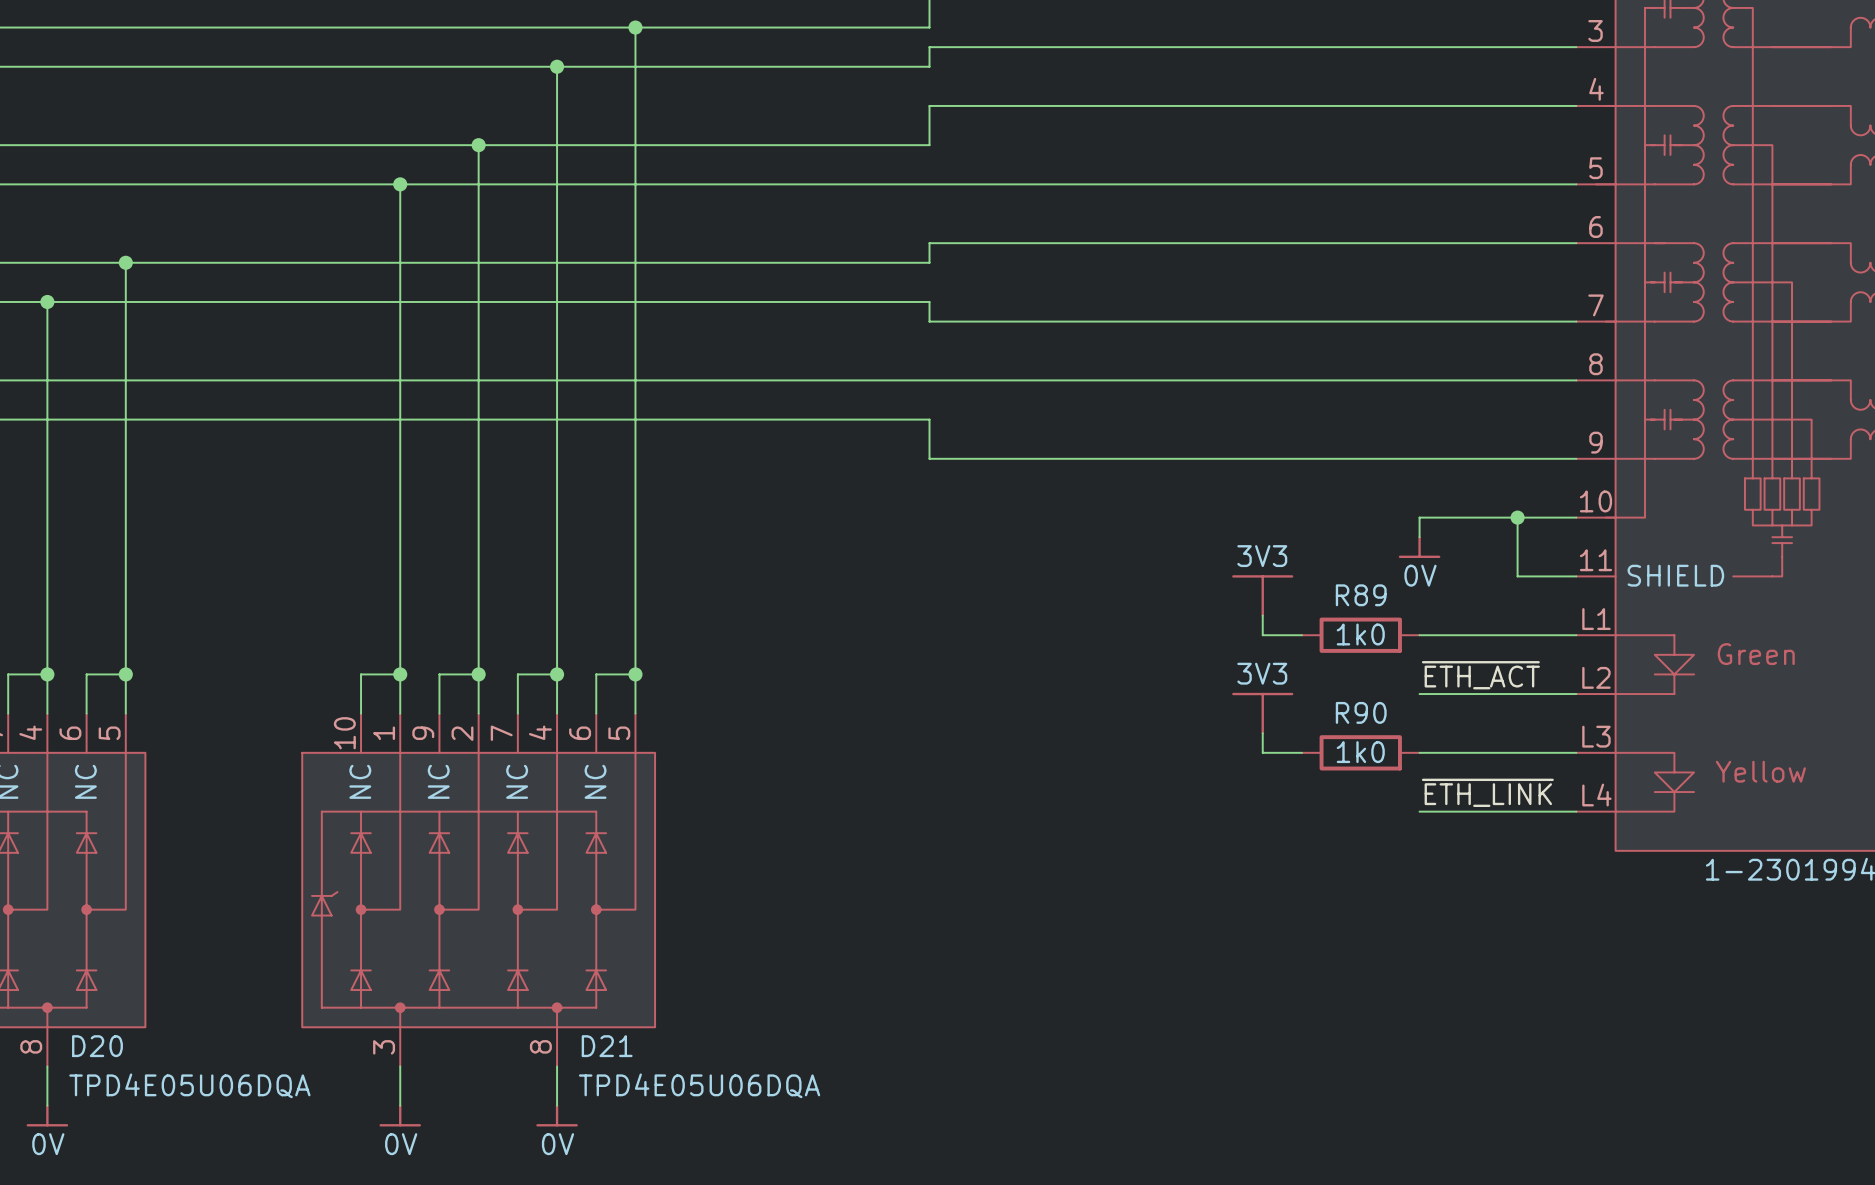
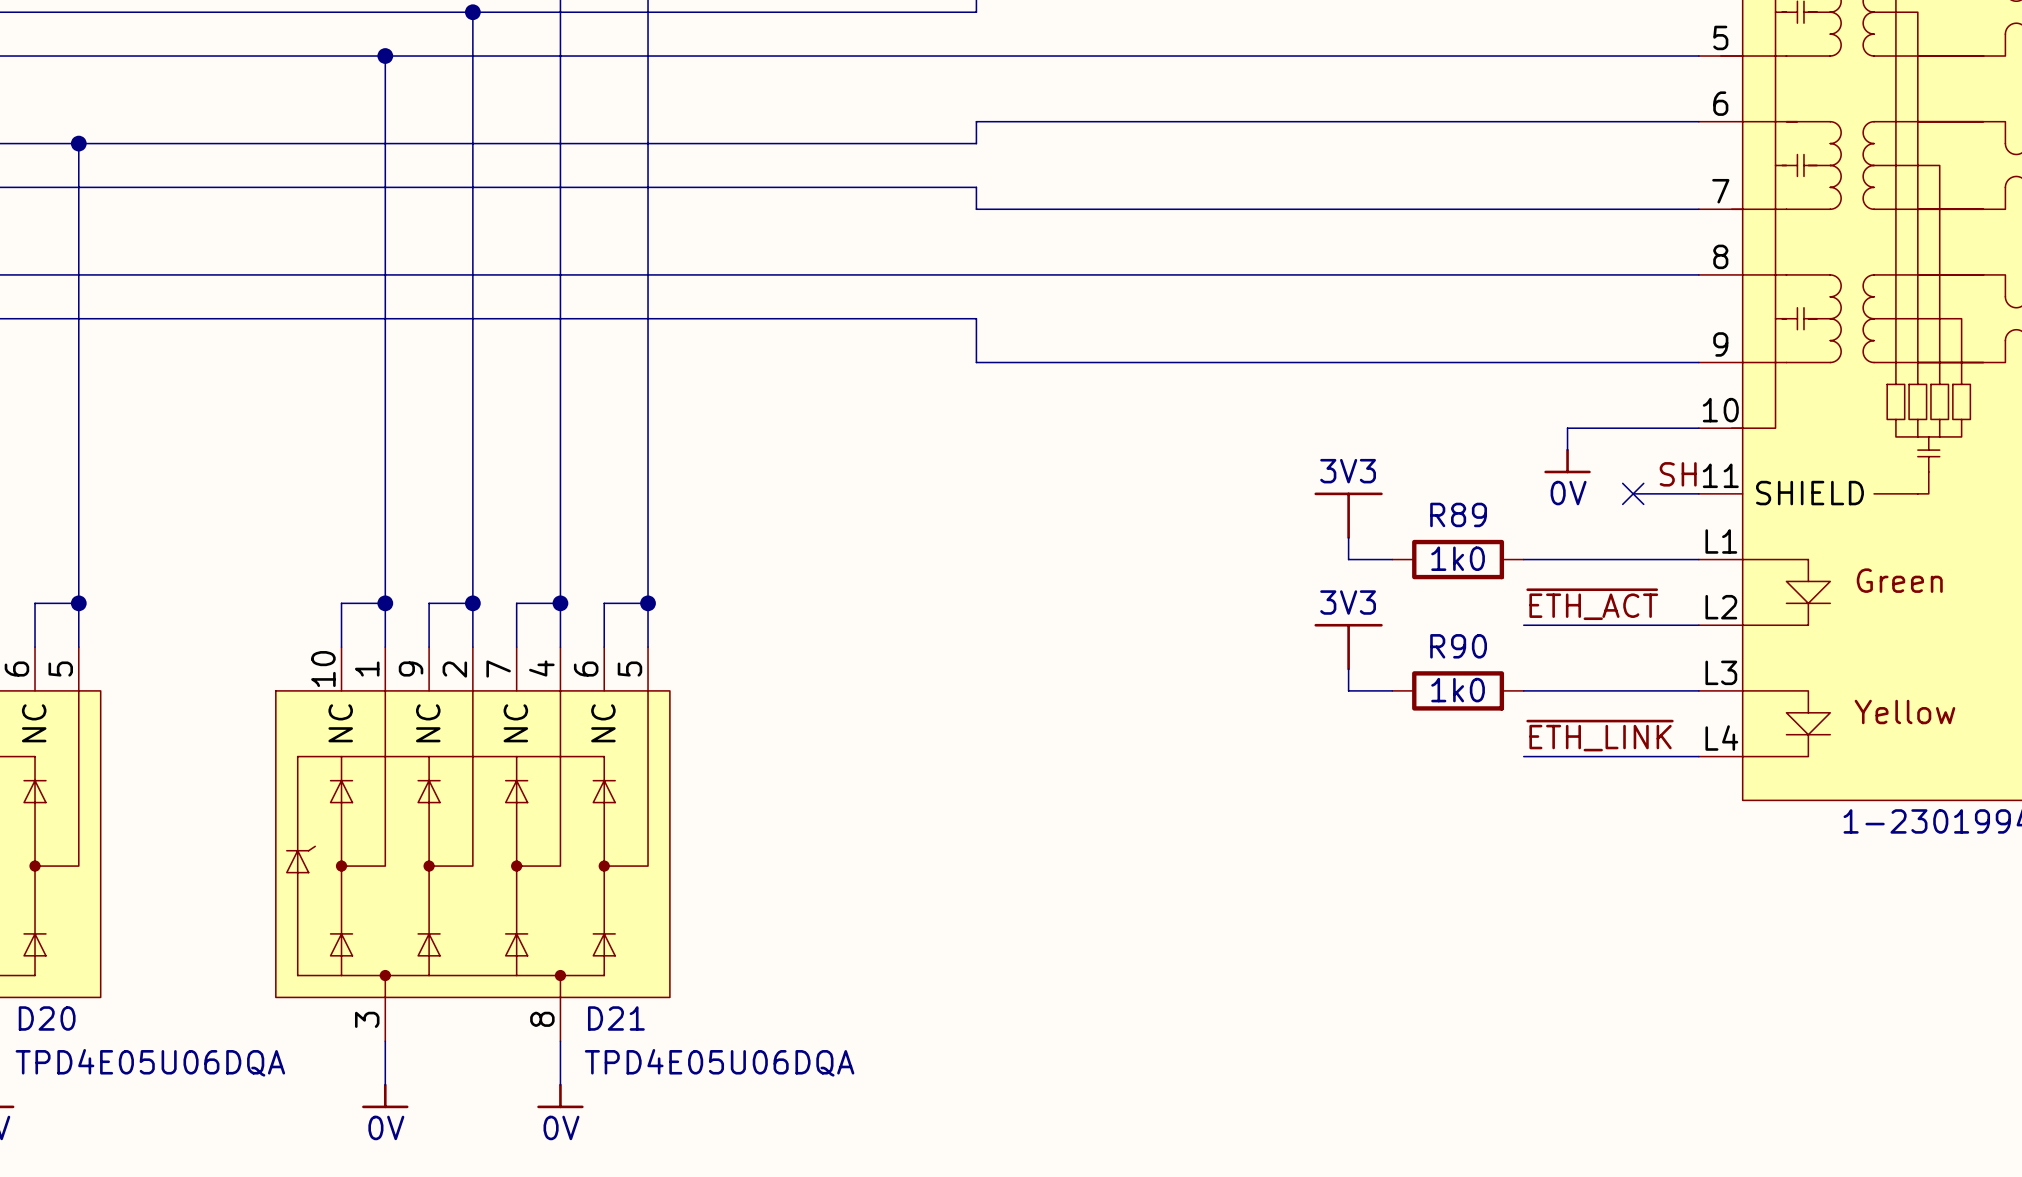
wire: (1458, 517) (1419, 517) (1419, 537) -> (1567, 428) (1567, 450)
wire: (1517, 517) (1517, 576) -> none
junction: (1517, 517) -> none
power symbol position: 0V (1419, 547) -> 0V (1567, 461)
label: none -> SH (1678, 474)
no-connect mark: none -> (1633, 493)

